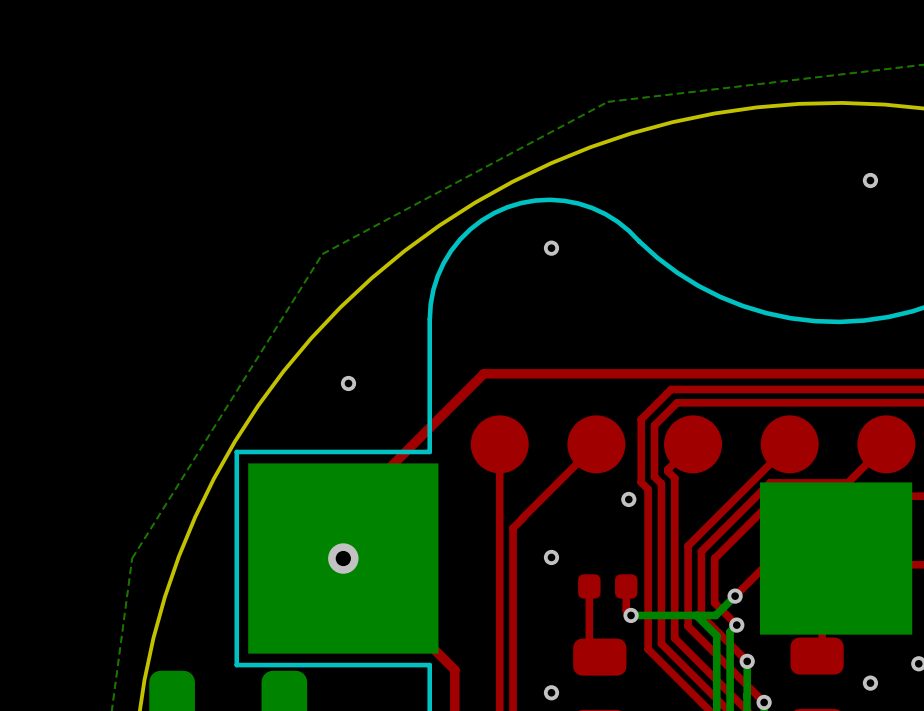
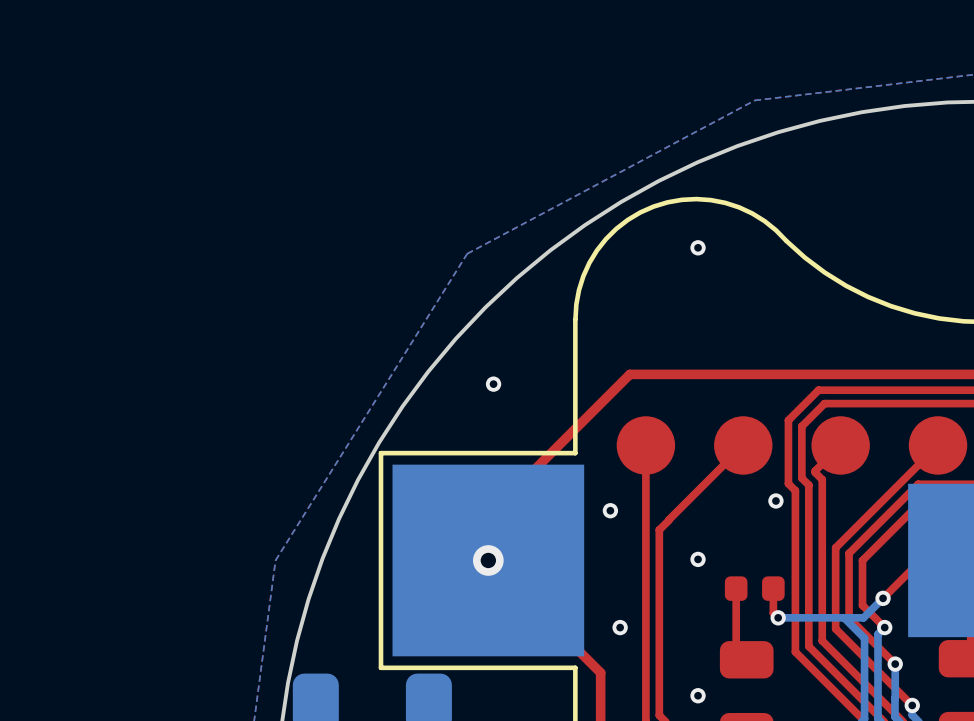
via: none -> (610, 510)
via: none -> (620, 627)

